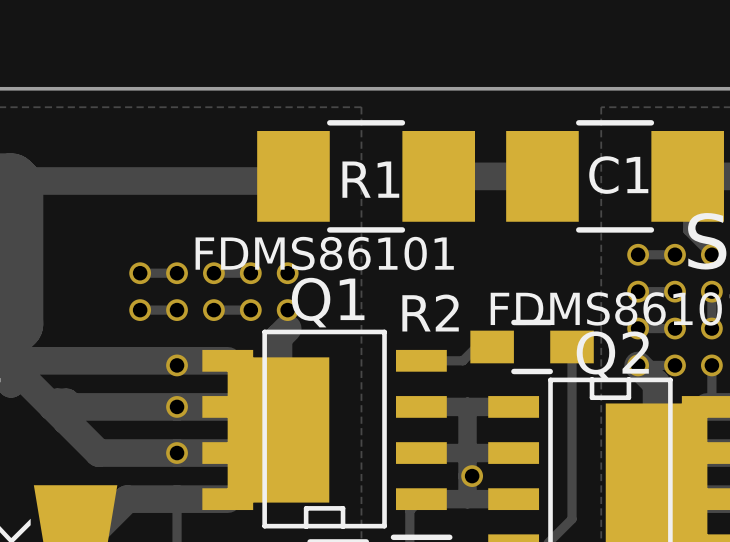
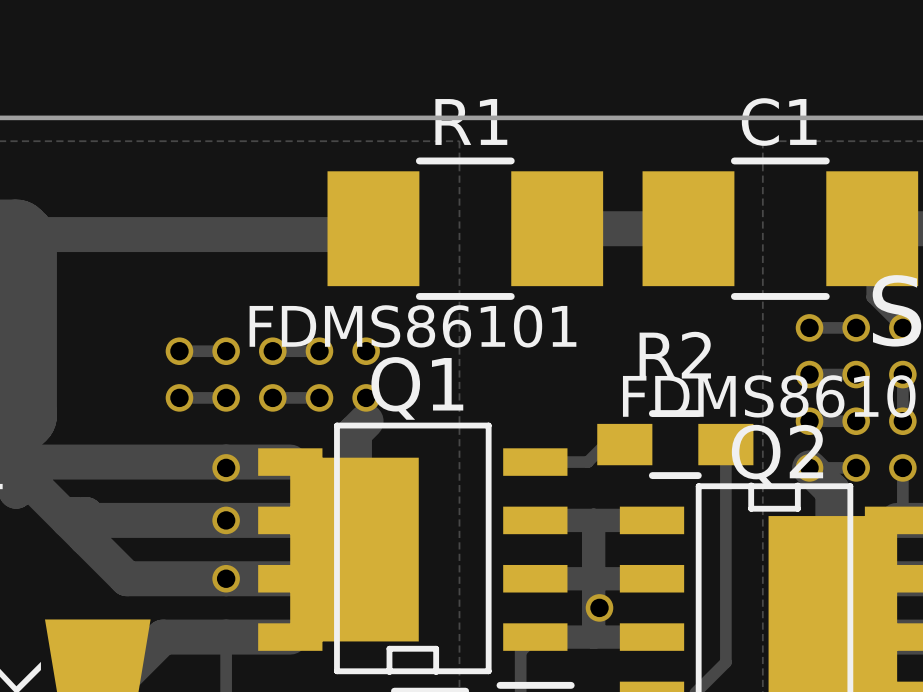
C1 name position: C1 (618, 175) -> C1 (779, 122)
R1 name position: R1 (370, 179) -> R1 (471, 121)
R2 name position: R2 (430, 313) -> R2 (675, 355)

